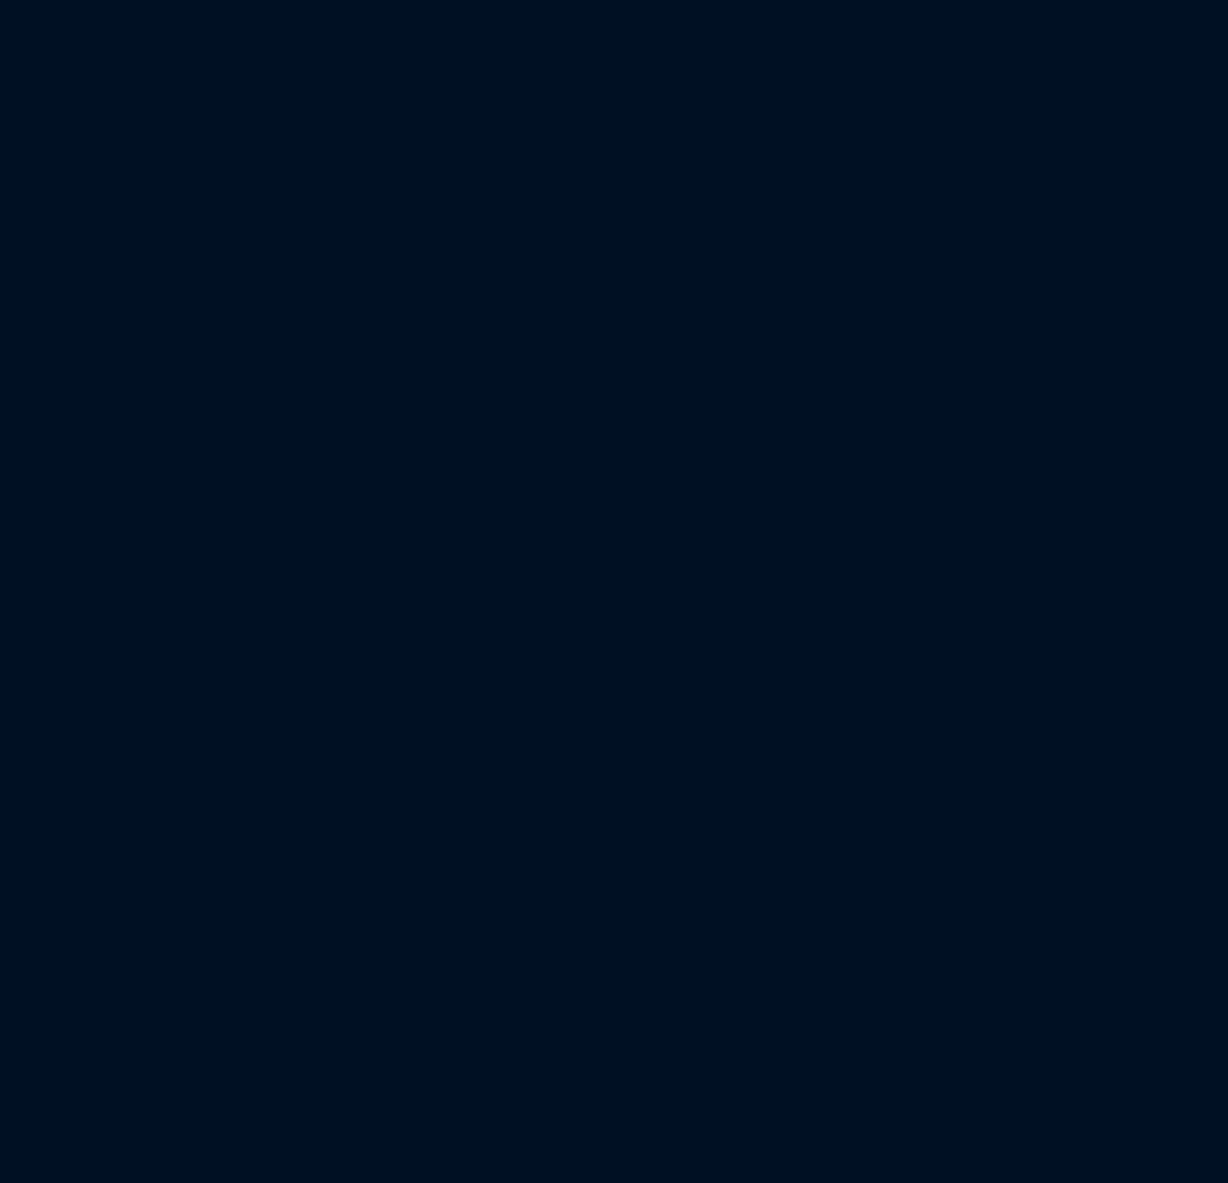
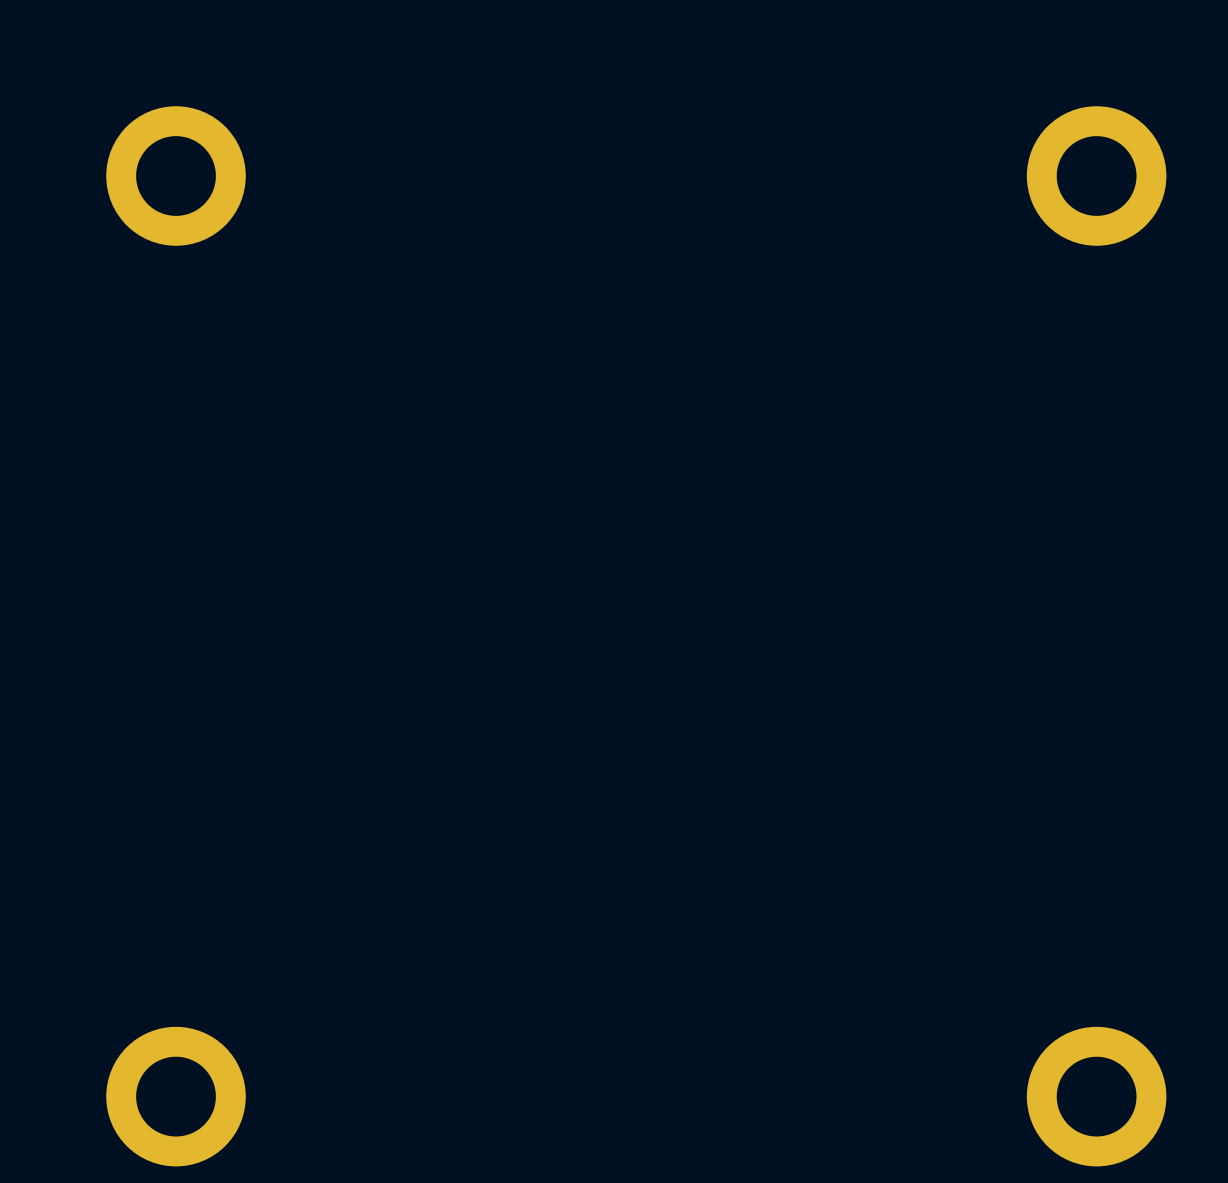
part: none -> (176, 176)
part: none -> (1096, 176)
part: none -> (176, 1096)
part: none -> (1096, 1096)

